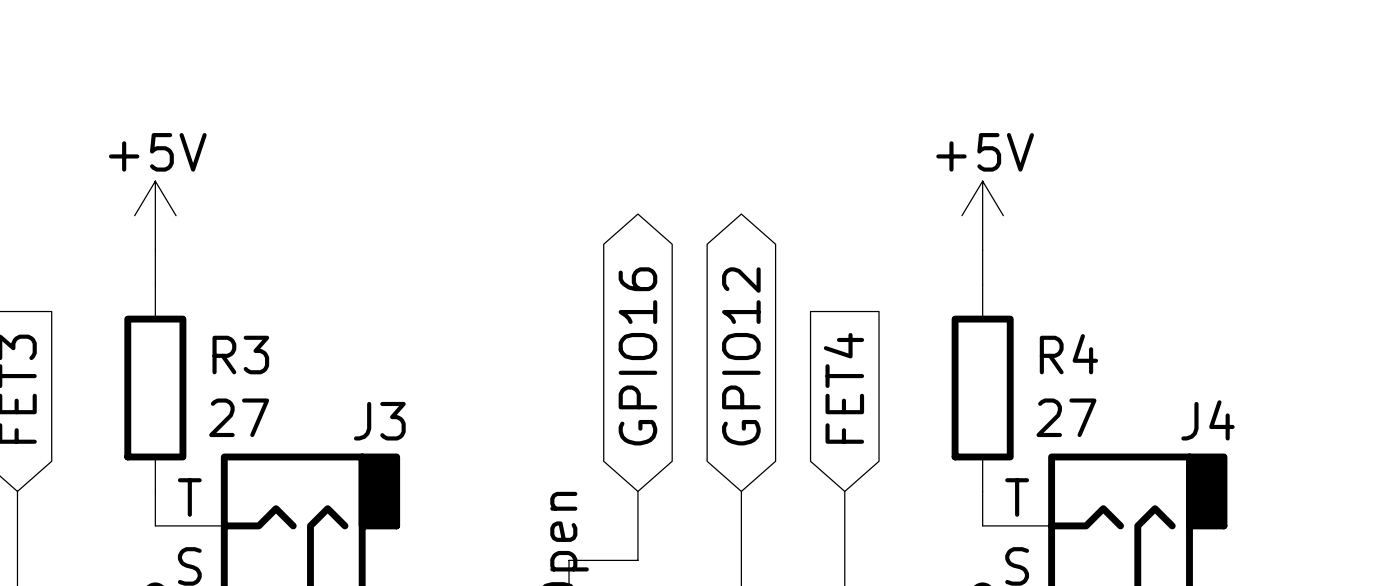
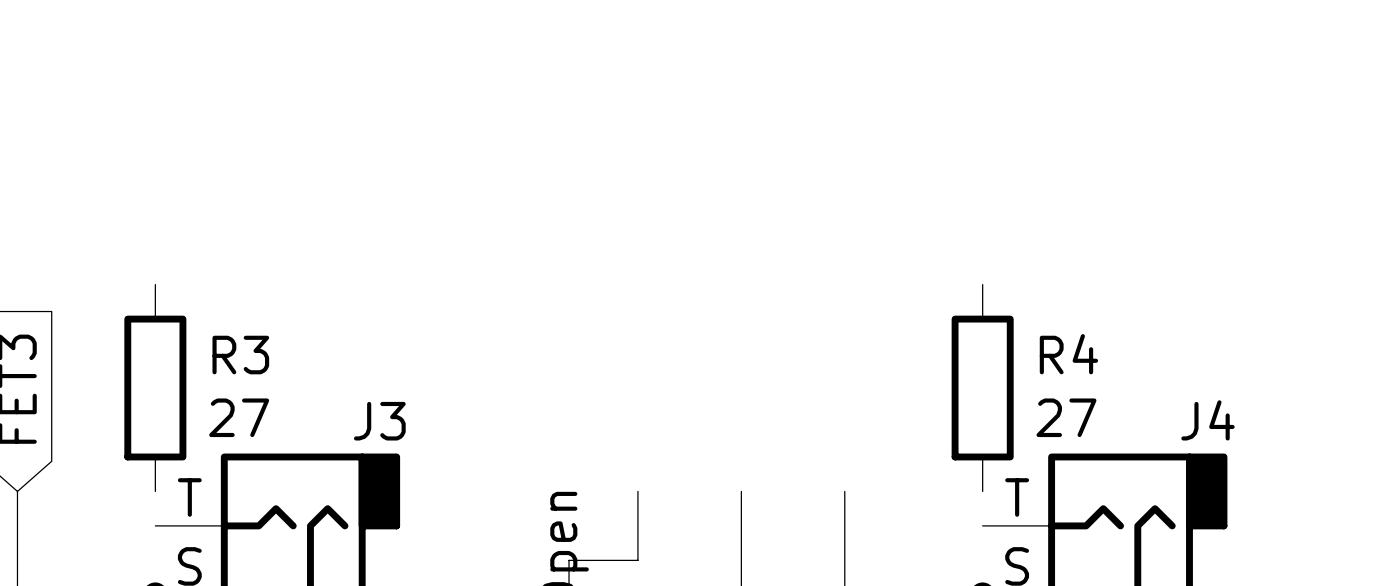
power symbol: +5V (155, 215) -> none
power symbol: +5V (982, 215) -> none
wire: (155, 250) (155, 284) -> none
wire: (982, 250) (982, 284) -> none
global label: GPIO16 (637, 356) -> none
global label: GPIO12 (741, 356) -> none
global label: FET4 (843, 388) -> none
wire: (155, 491) (155, 525) -> none
wire: (982, 491) (982, 525) -> none

